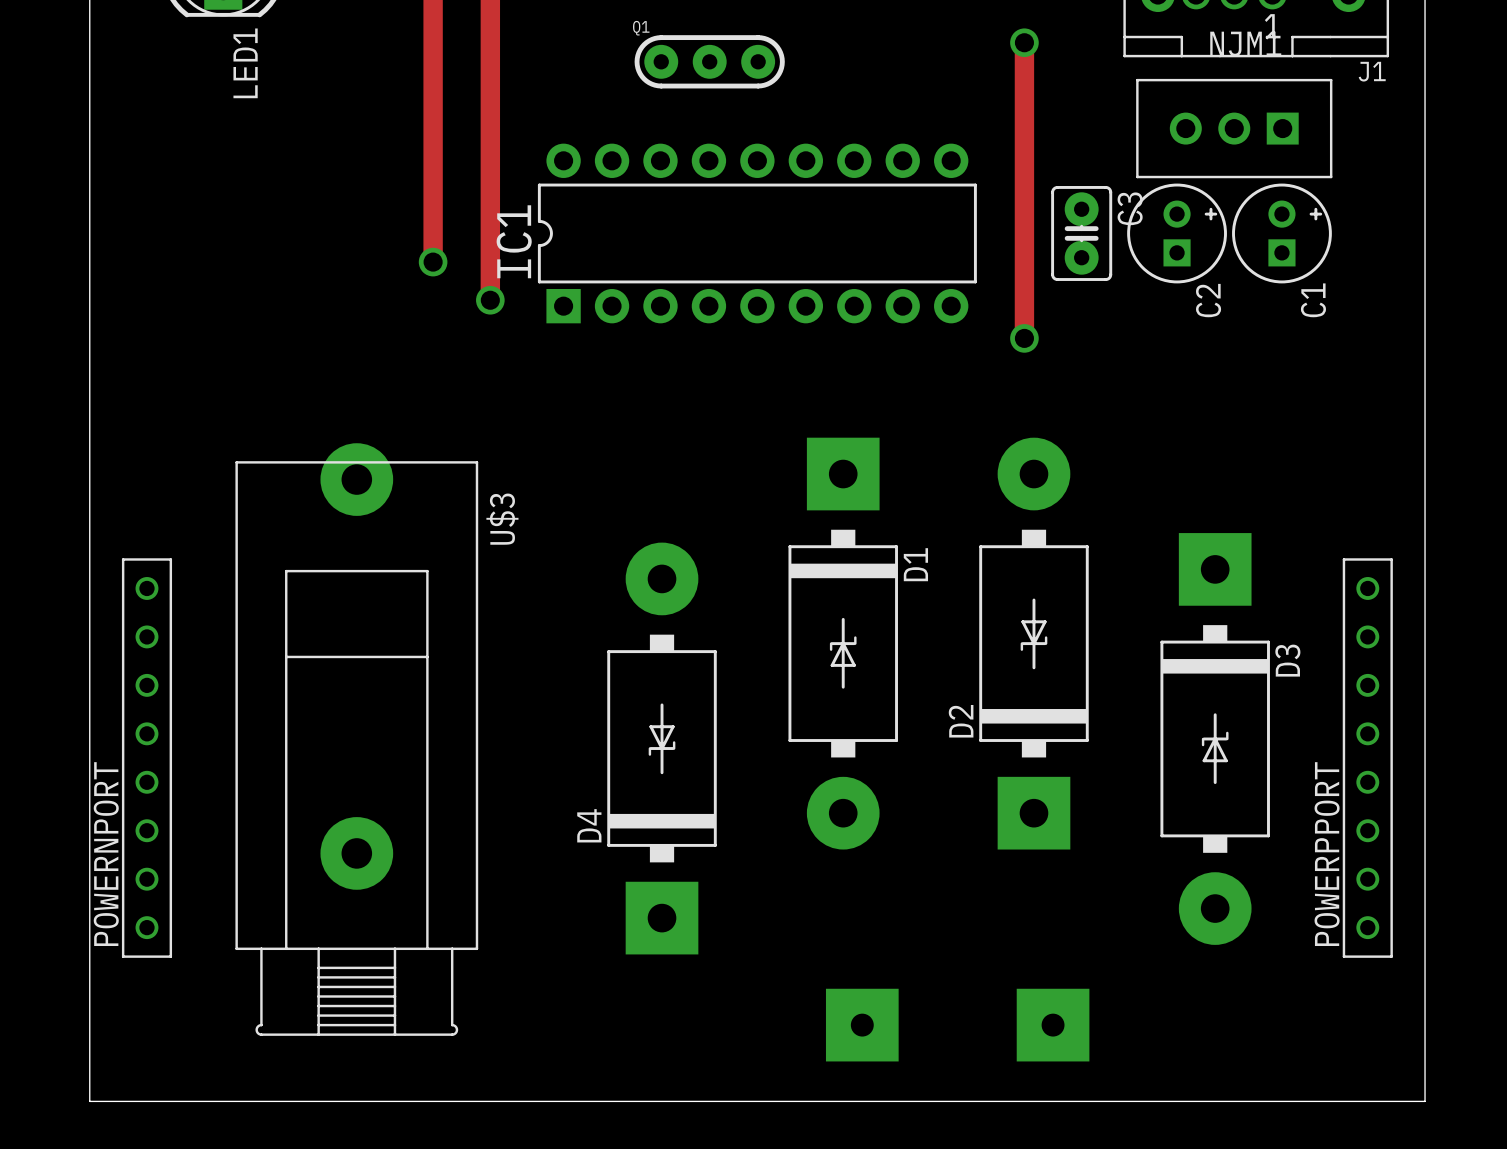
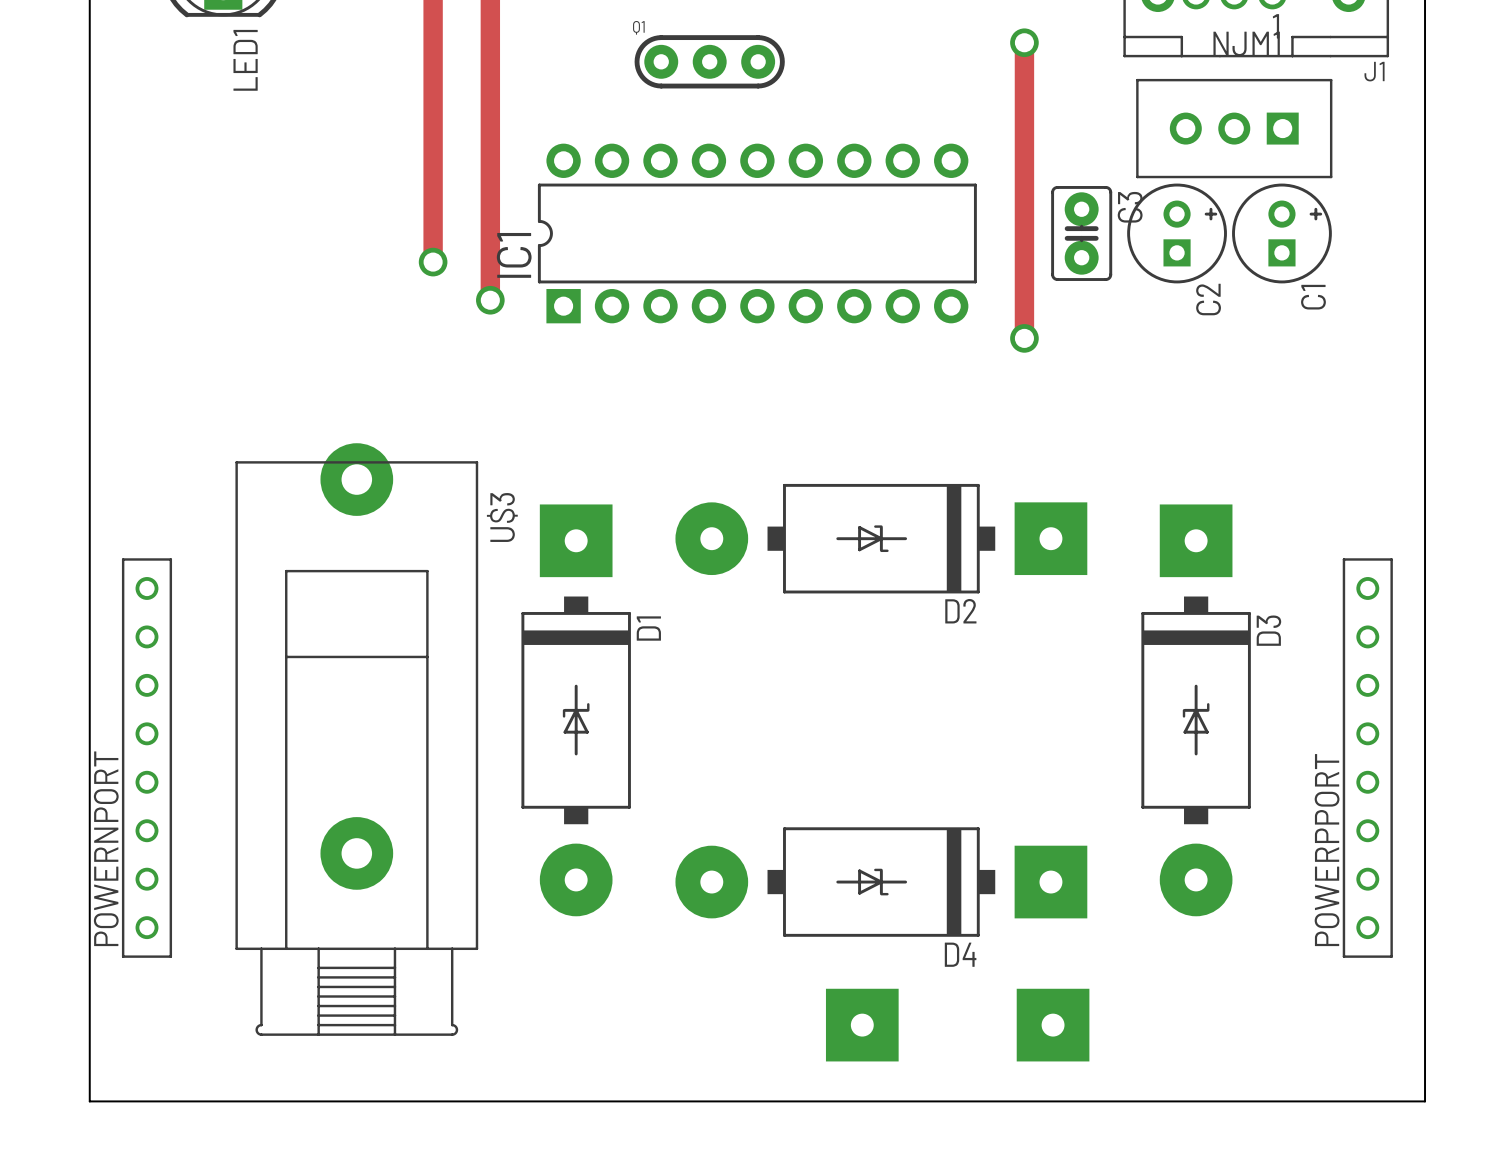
D1 footprint: [788, 437, 898, 850] -> [521, 504, 631, 917]
D2 footprint: [979, 437, 1089, 850] -> [675, 483, 1088, 594]
D3 footprint: [1160, 533, 1270, 945] -> [1141, 504, 1251, 917]
D4 footprint: [607, 542, 717, 955] -> [675, 827, 1088, 937]
D2 name position: D2 (961, 721) -> D2 (960, 611)
D4 name position: D4 (589, 825) -> D4 (960, 954)

